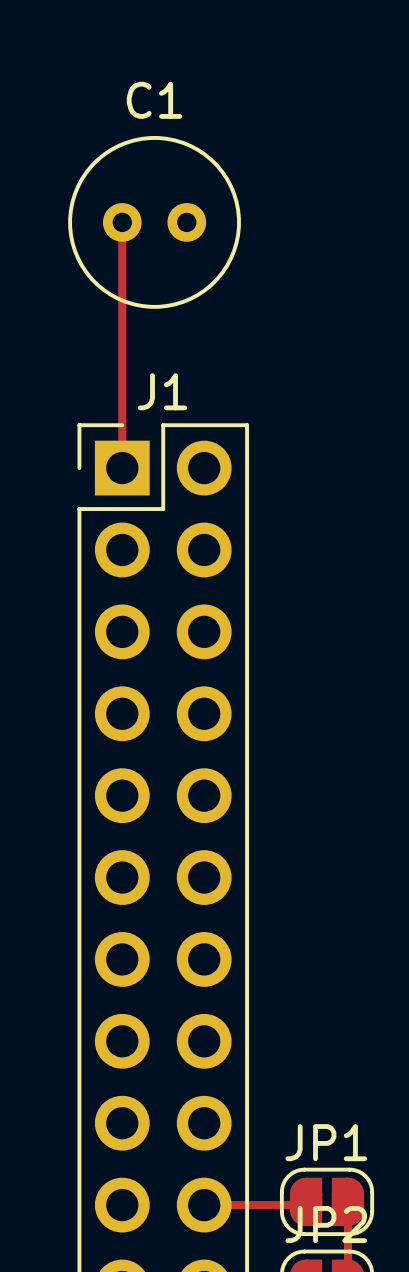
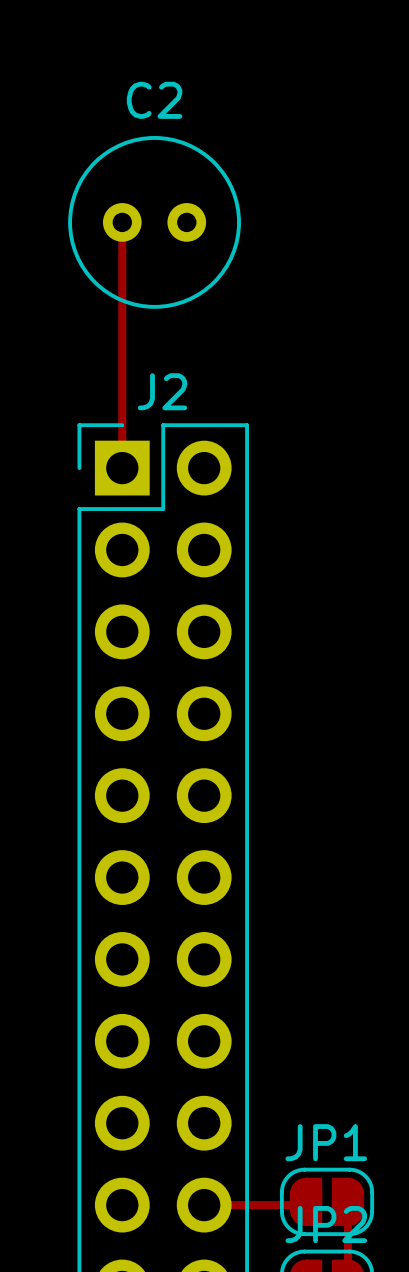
C1 name: C1 (154, 100) -> C2 (154, 100)
J1 name: J1 (162, 391) -> J2 (162, 391)

